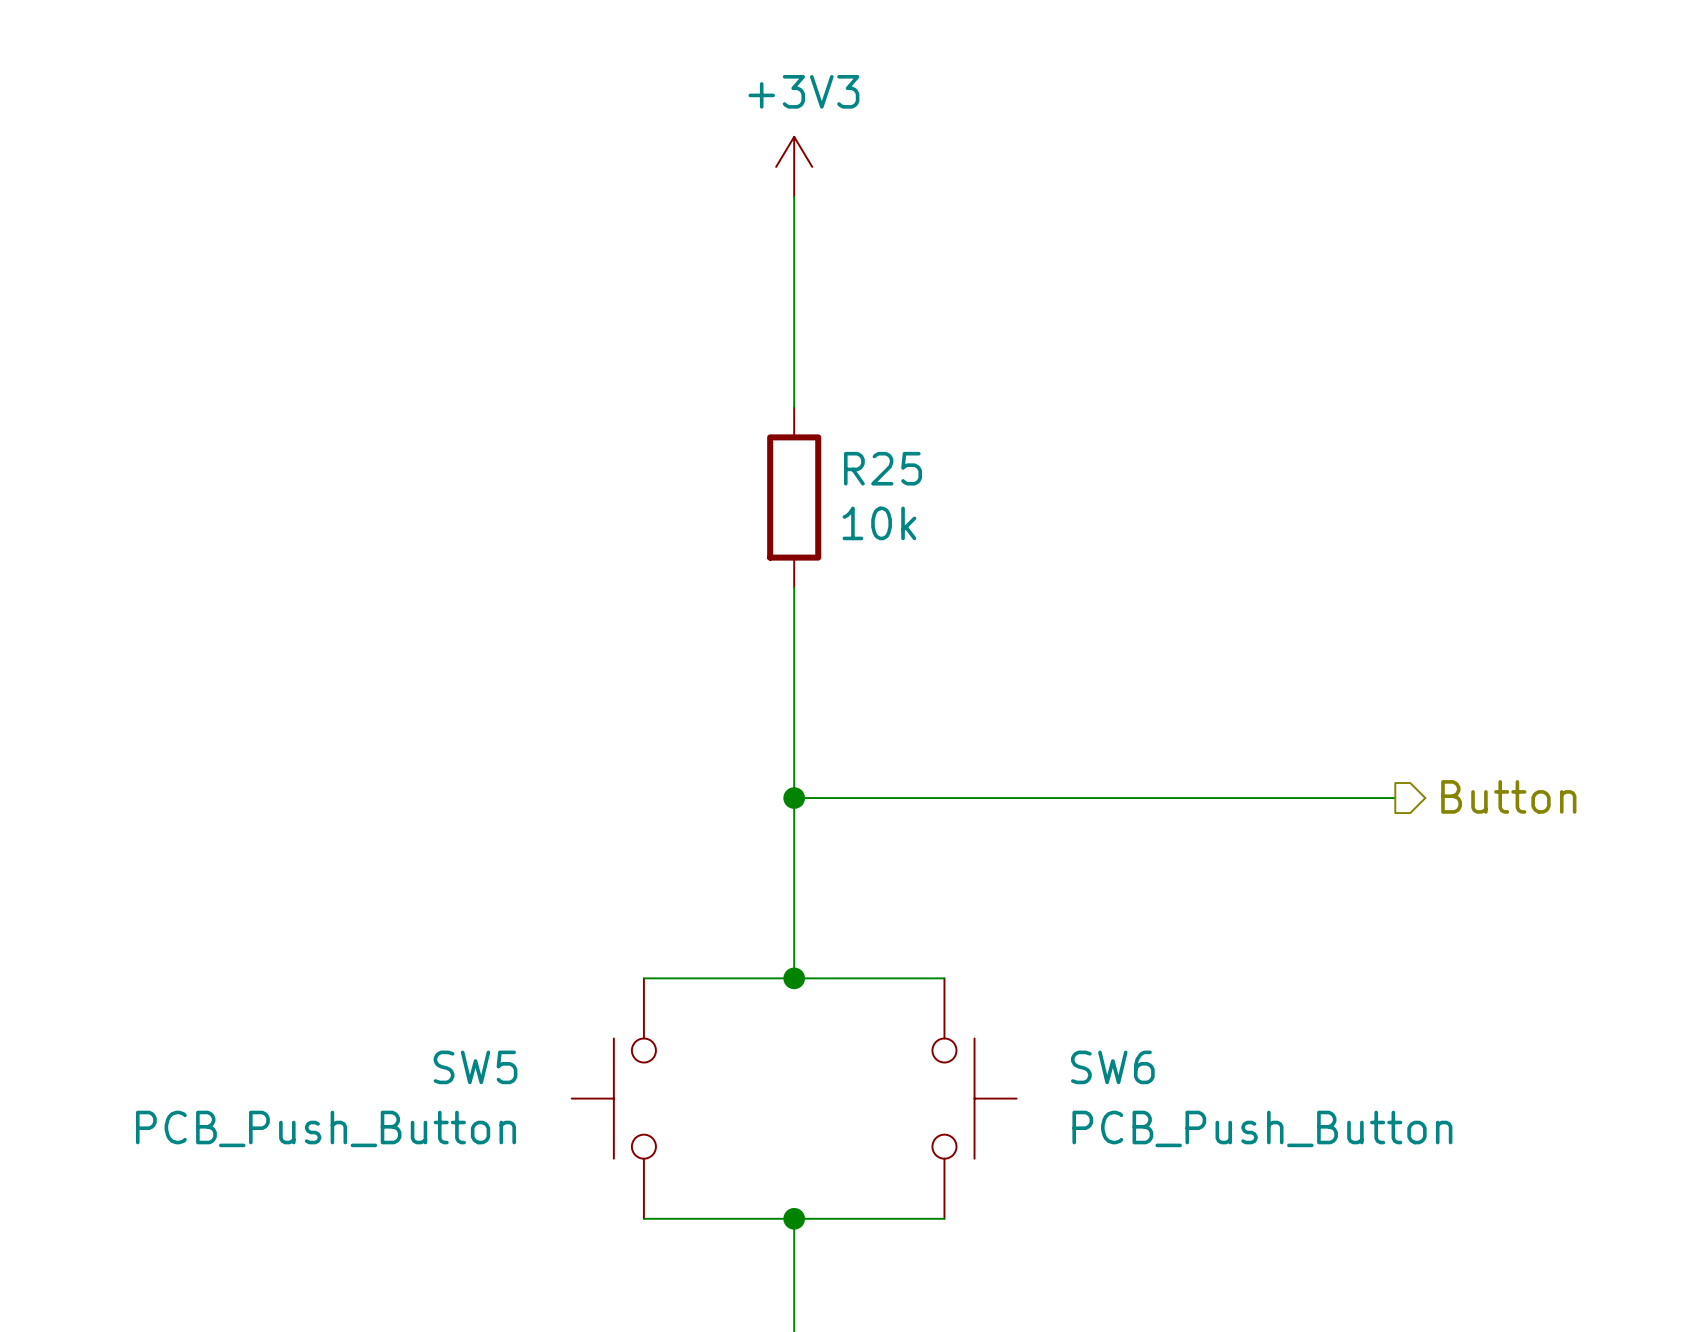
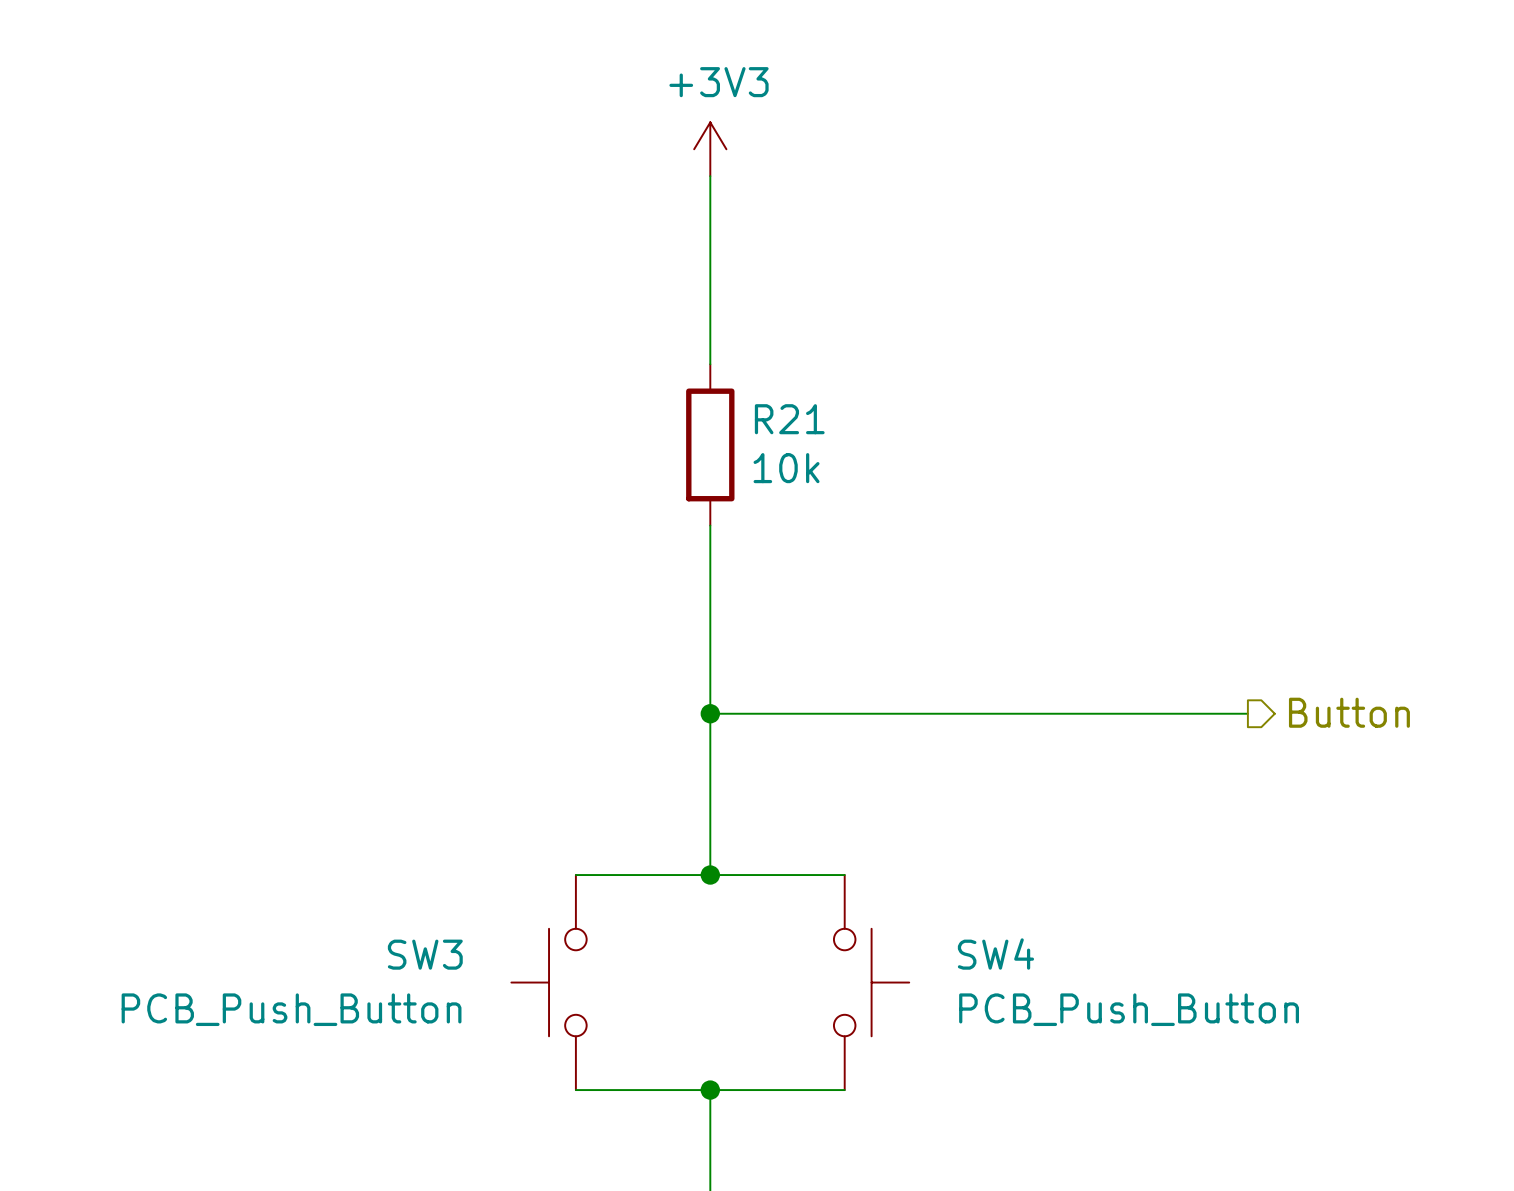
R25 name: R25 (883, 468) -> R21 (789, 419)
SW5 name: SW5 (475, 1067) -> SW3 (425, 954)
SW6 name: SW6 (1112, 1067) -> SW4 (995, 954)

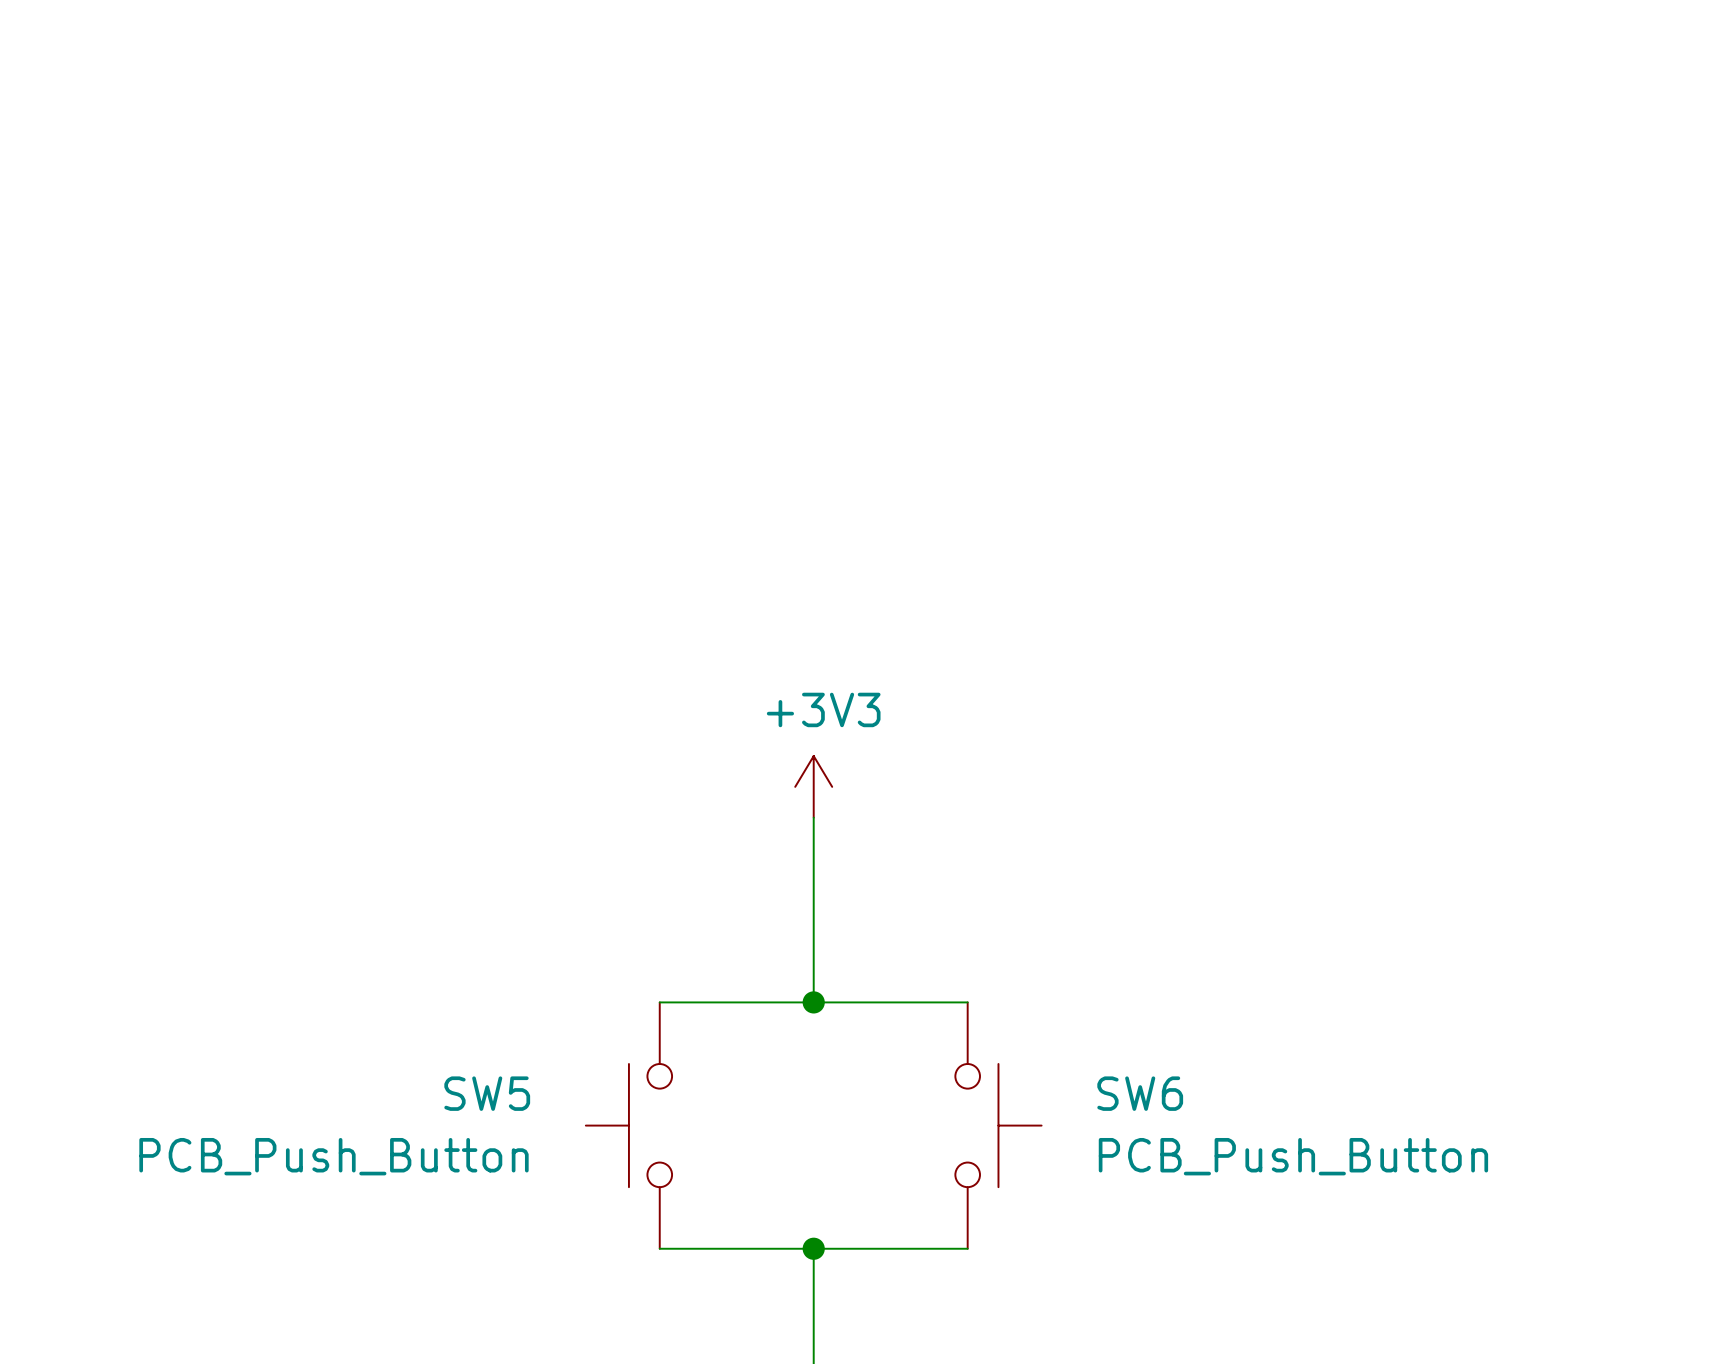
power symbol: +3V3 (710, 149) -> none
wire: (710, 176) (710, 364) -> none
R21: 10k (710, 444) -> none
wire: (710, 525) (710, 713) (1247, 713) -> none
power symbol: none -> +3V3 (813, 786)
hierarchical label: Button (1349, 712) -> none
junction: (710, 713) -> none
SW3 name: SW3 (425, 954) -> SW5 (487, 1093)
SW4 name: SW4 (995, 954) -> SW6 (1140, 1093)

